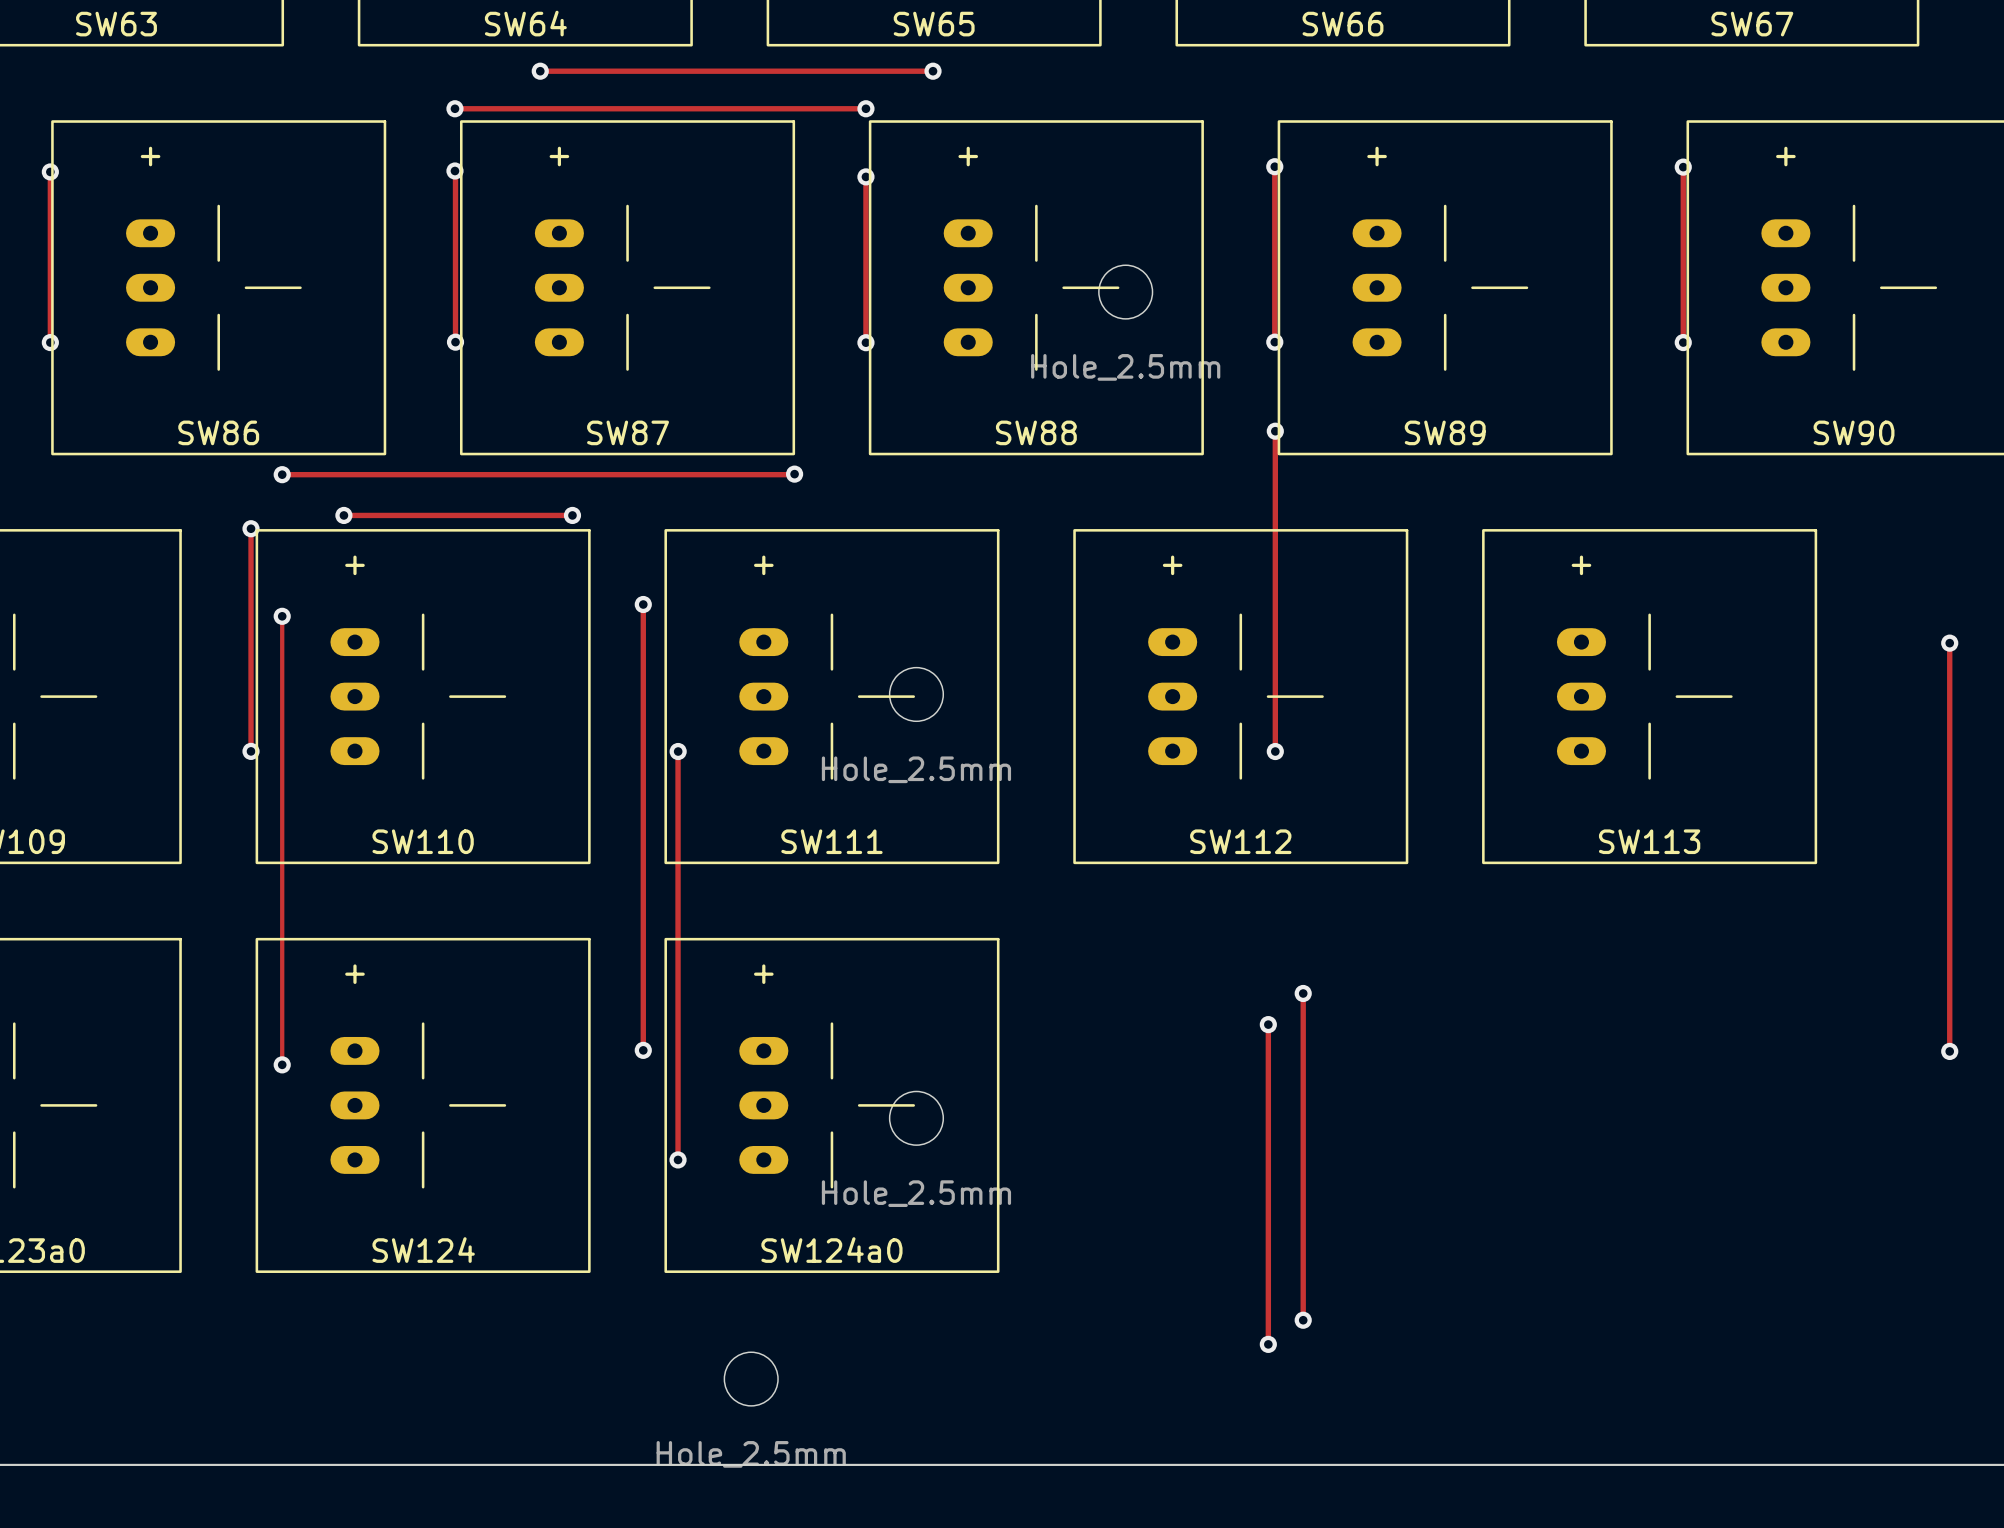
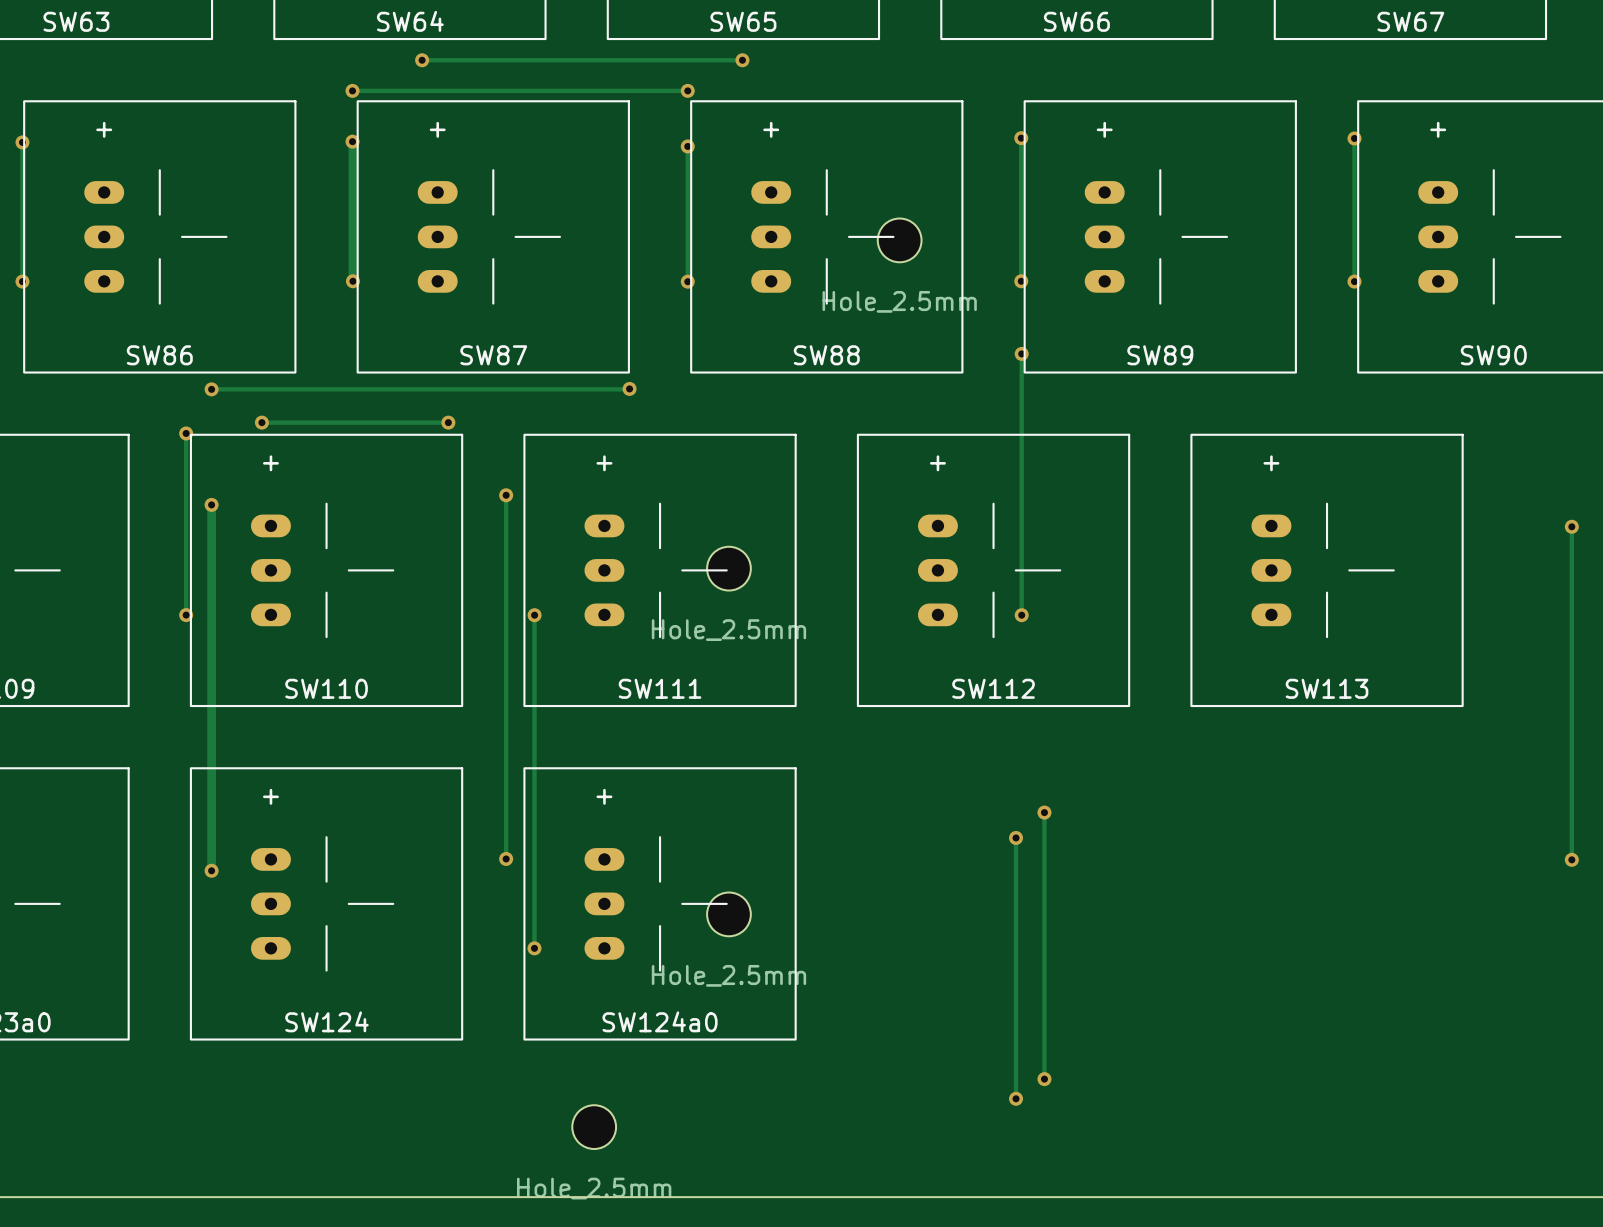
track width: thin (454, 171) (455, 342) -> thick (352, 141) (352, 281)
track width: thin (282, 616) (282, 1064) -> thick (211, 504) (211, 870)

